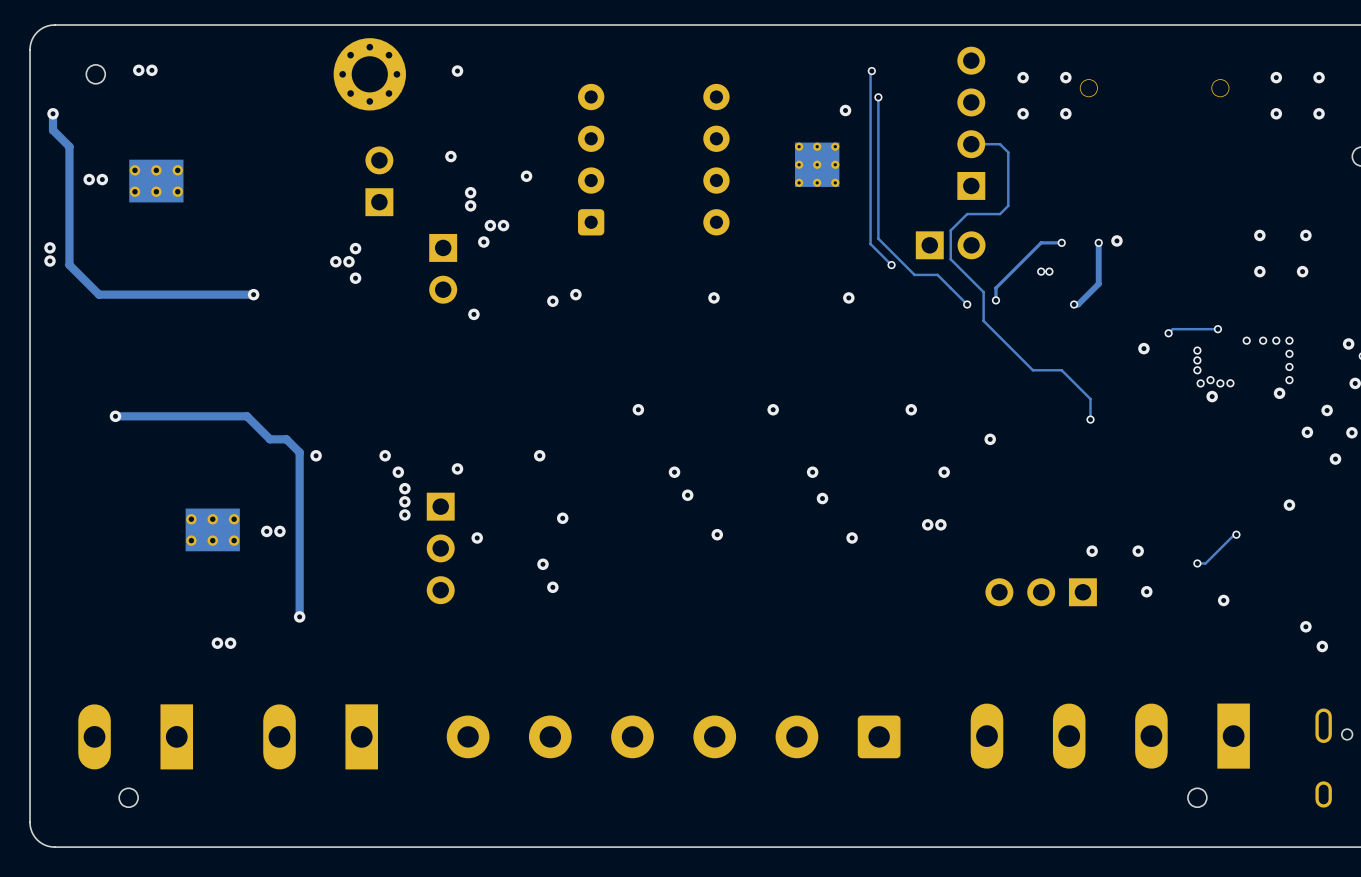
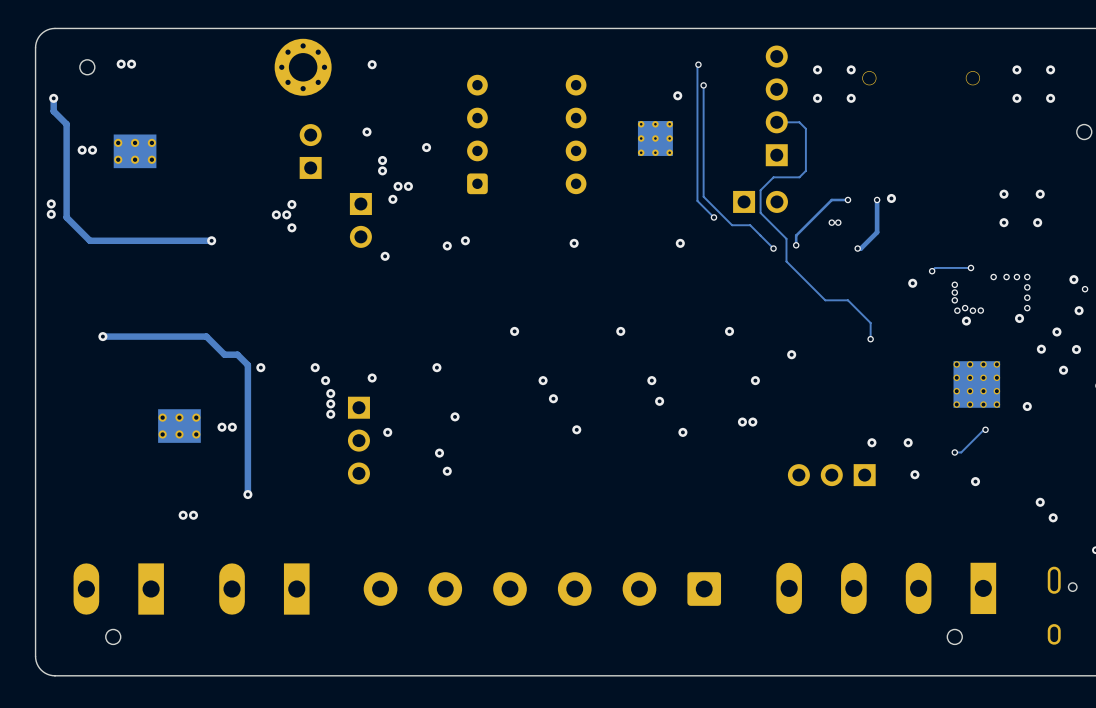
part: none -> (976, 384)

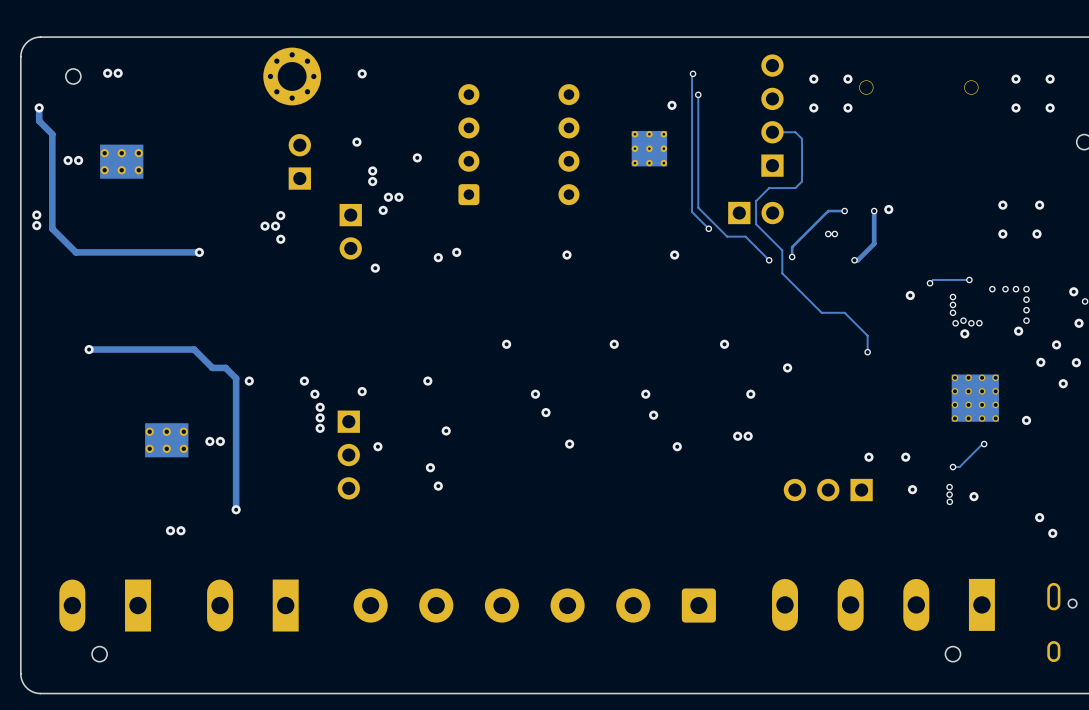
via: none -> (949, 487)
via: none -> (949, 494)
via: none -> (949, 501)

